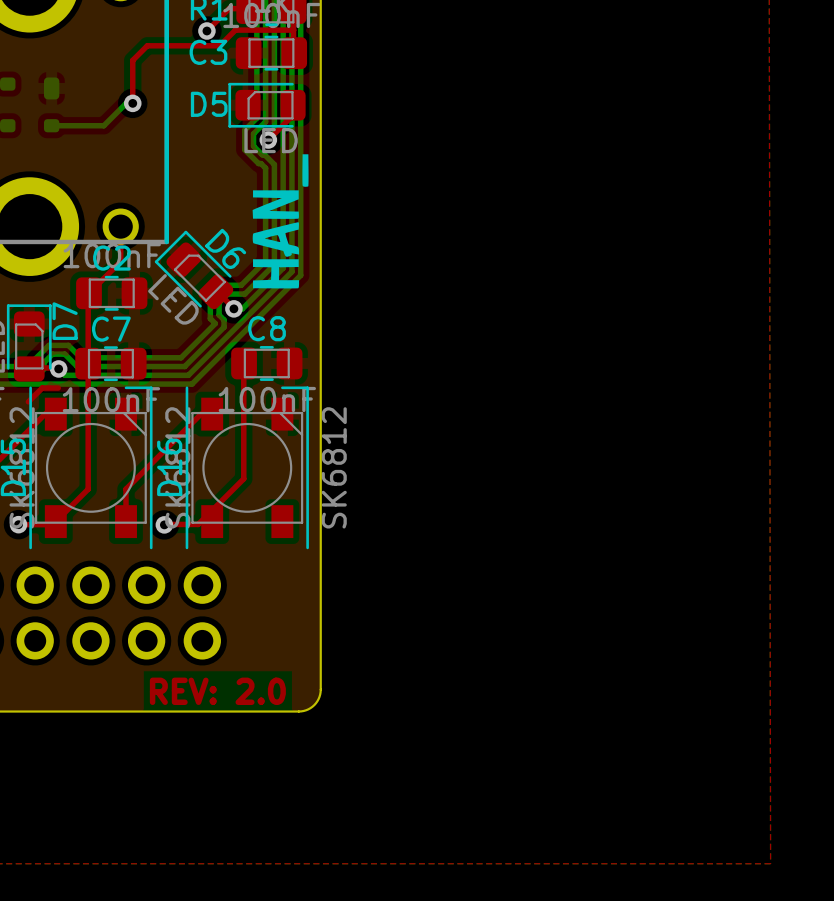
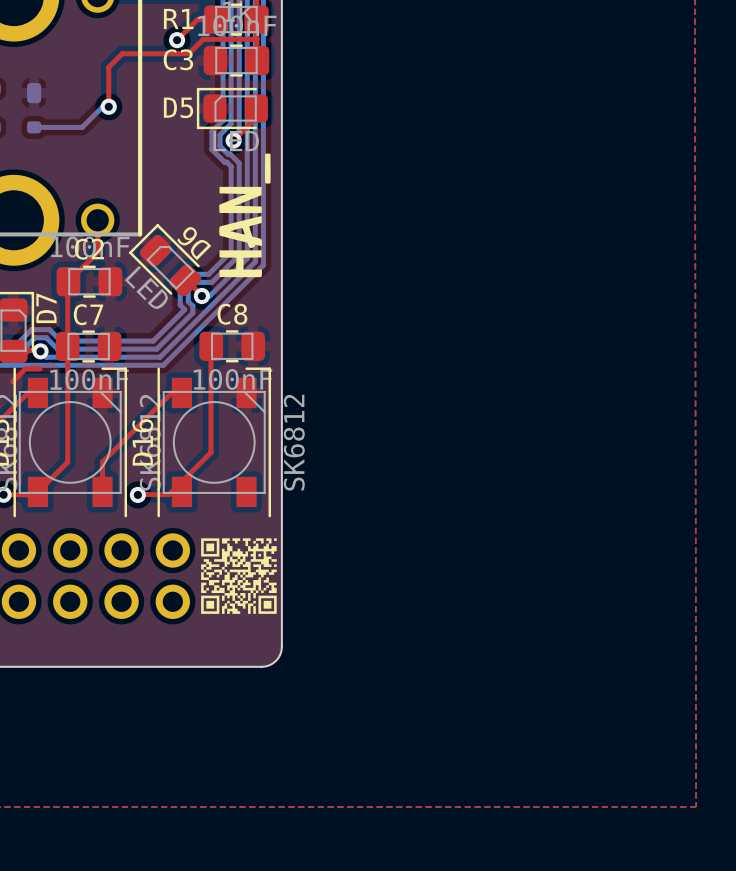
D6 name rotation: 0° (225, 248) -> 180° (194, 243)
drawing: none -> [201, 538, 277, 614]
text: REV: 2.0 (217, 691) -> none

